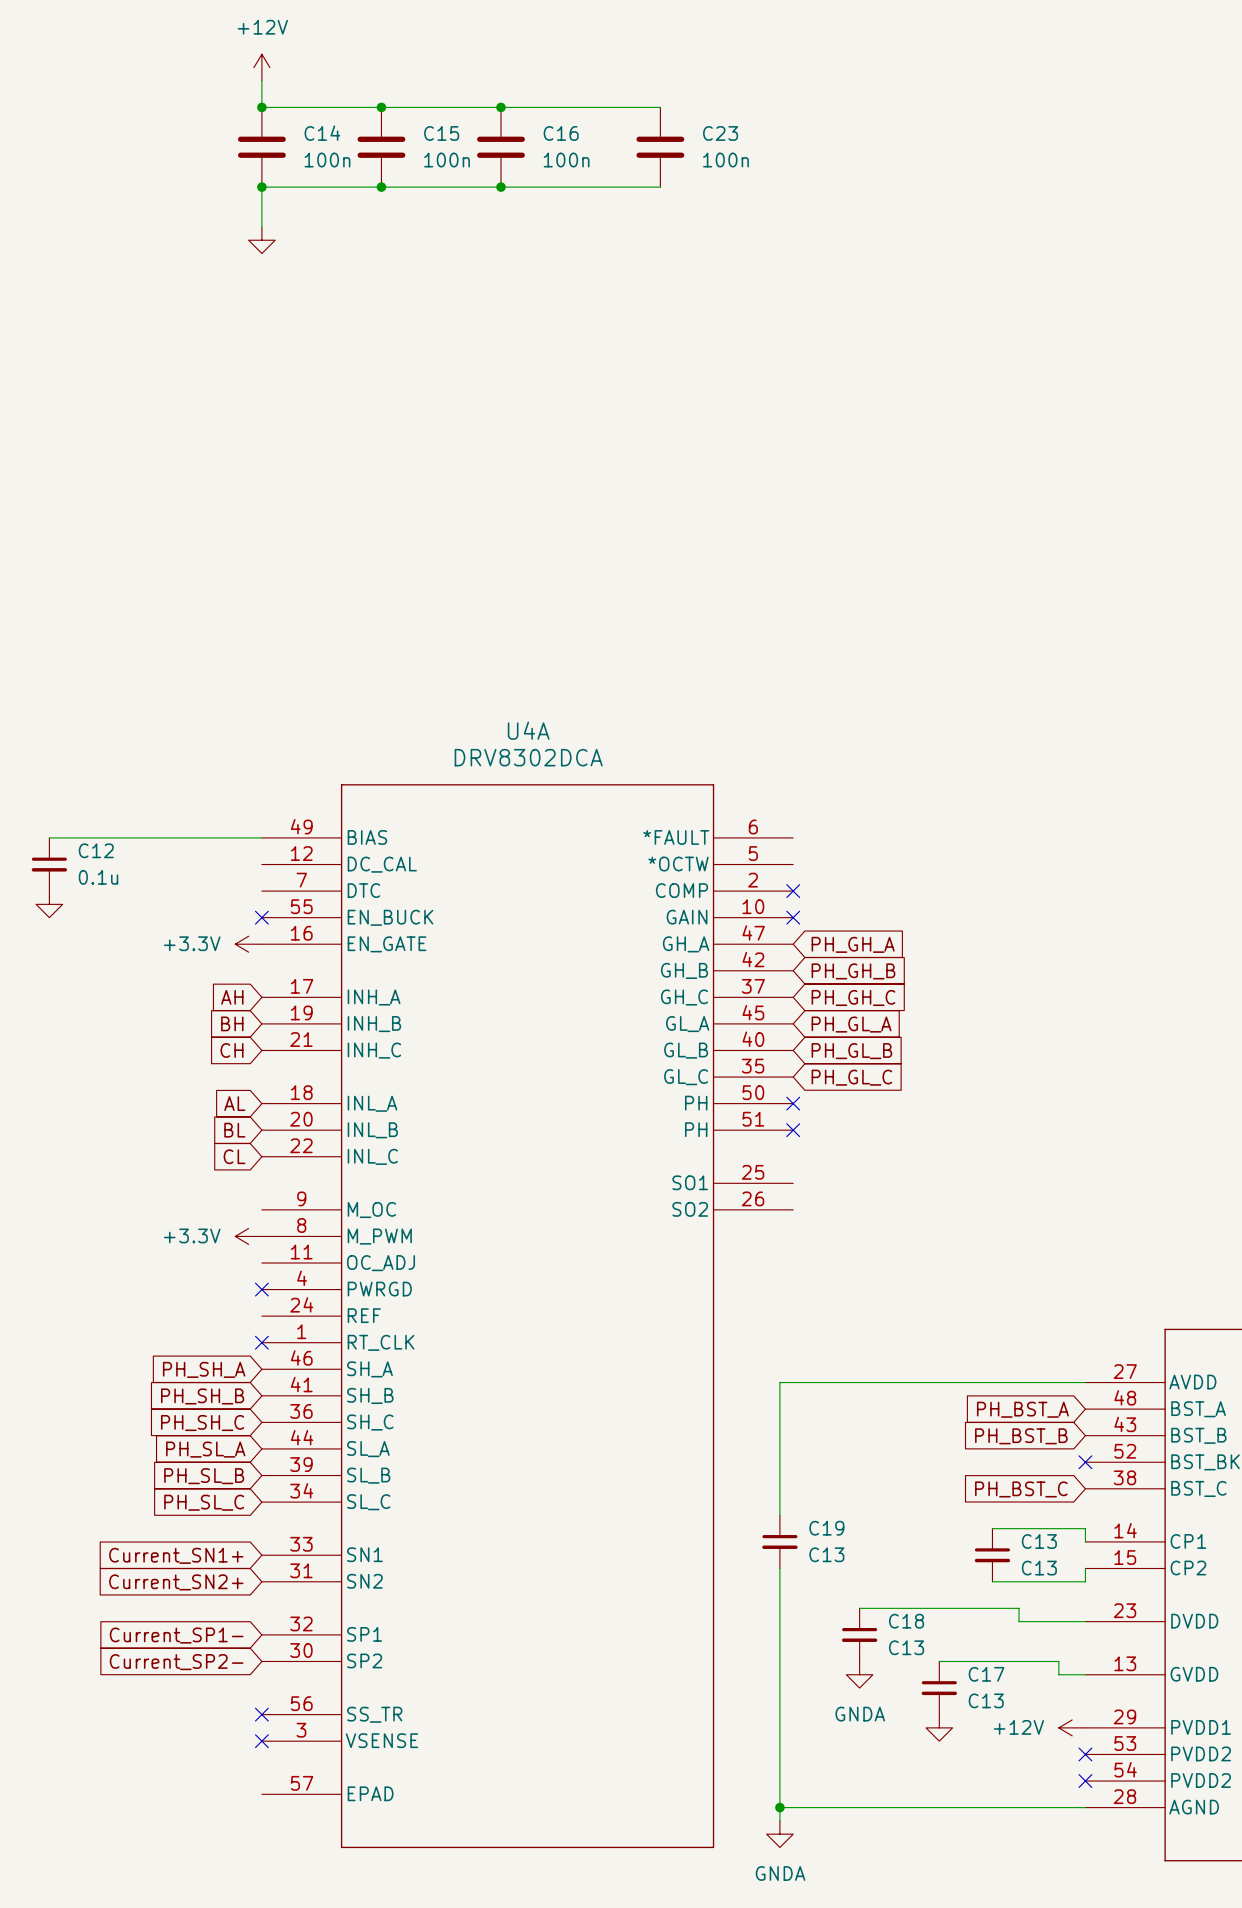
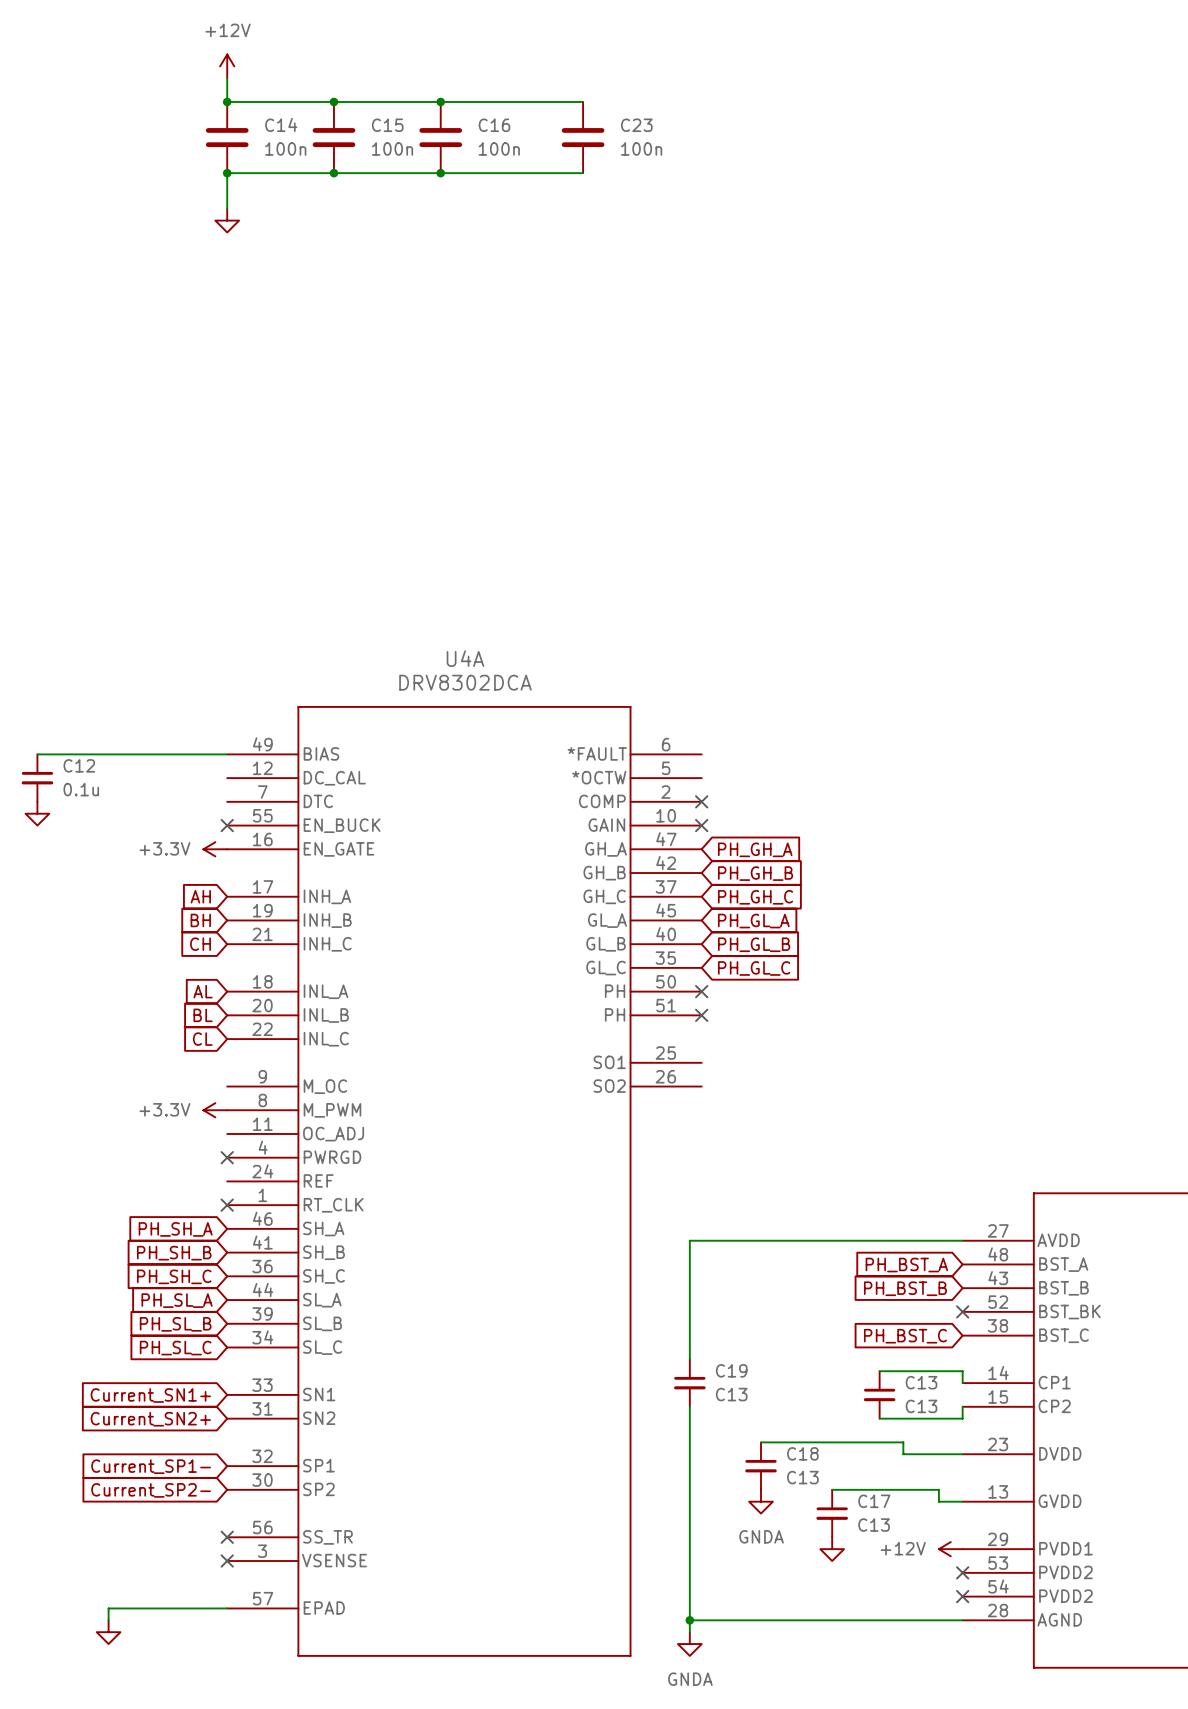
wire: none -> (227, 1608) (108, 1608) (108, 1620)
power symbol: none -> (108, 1632)

